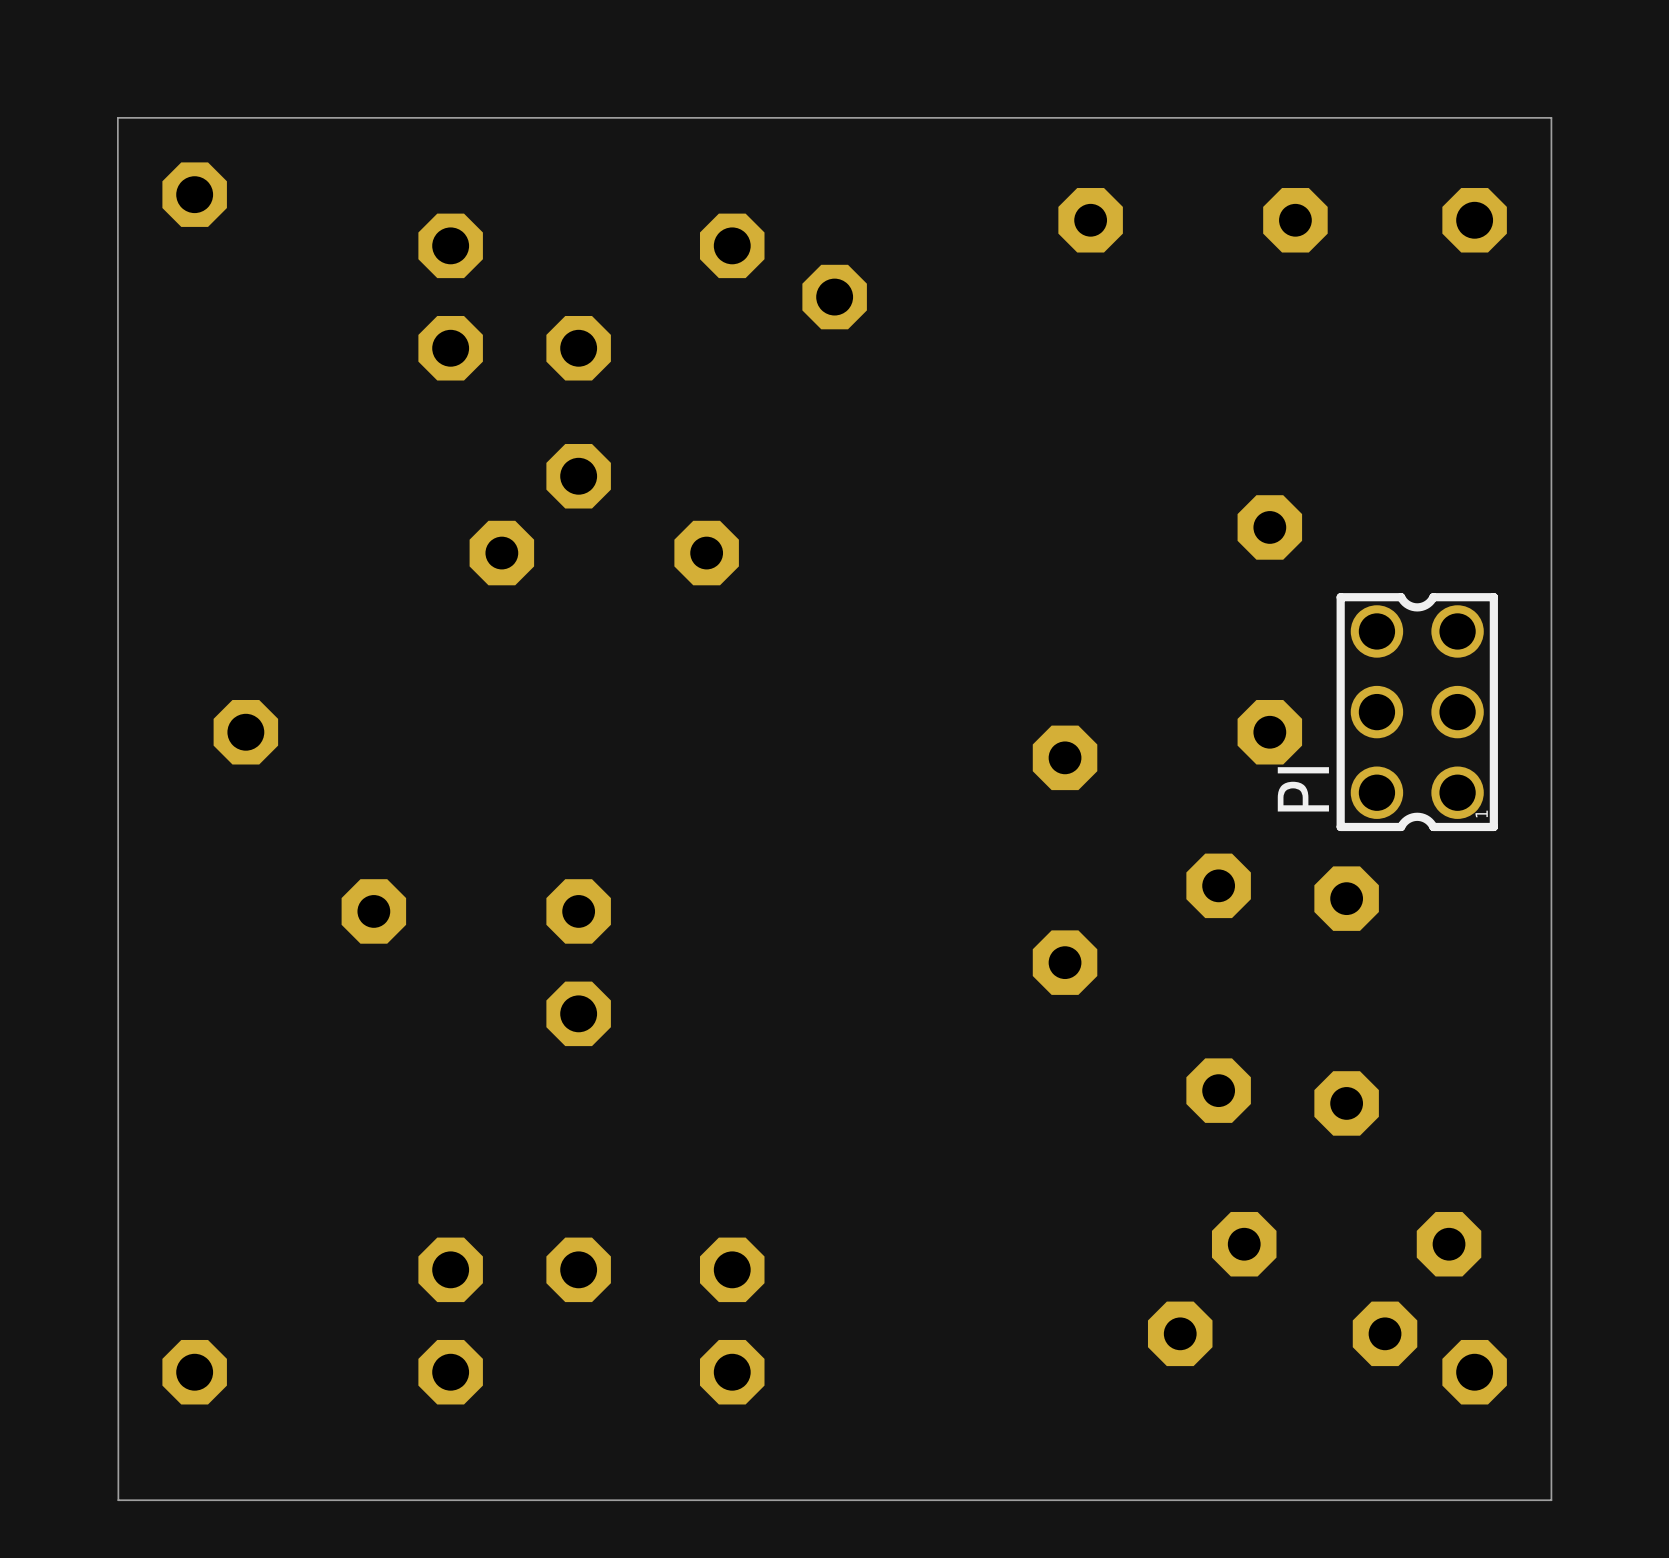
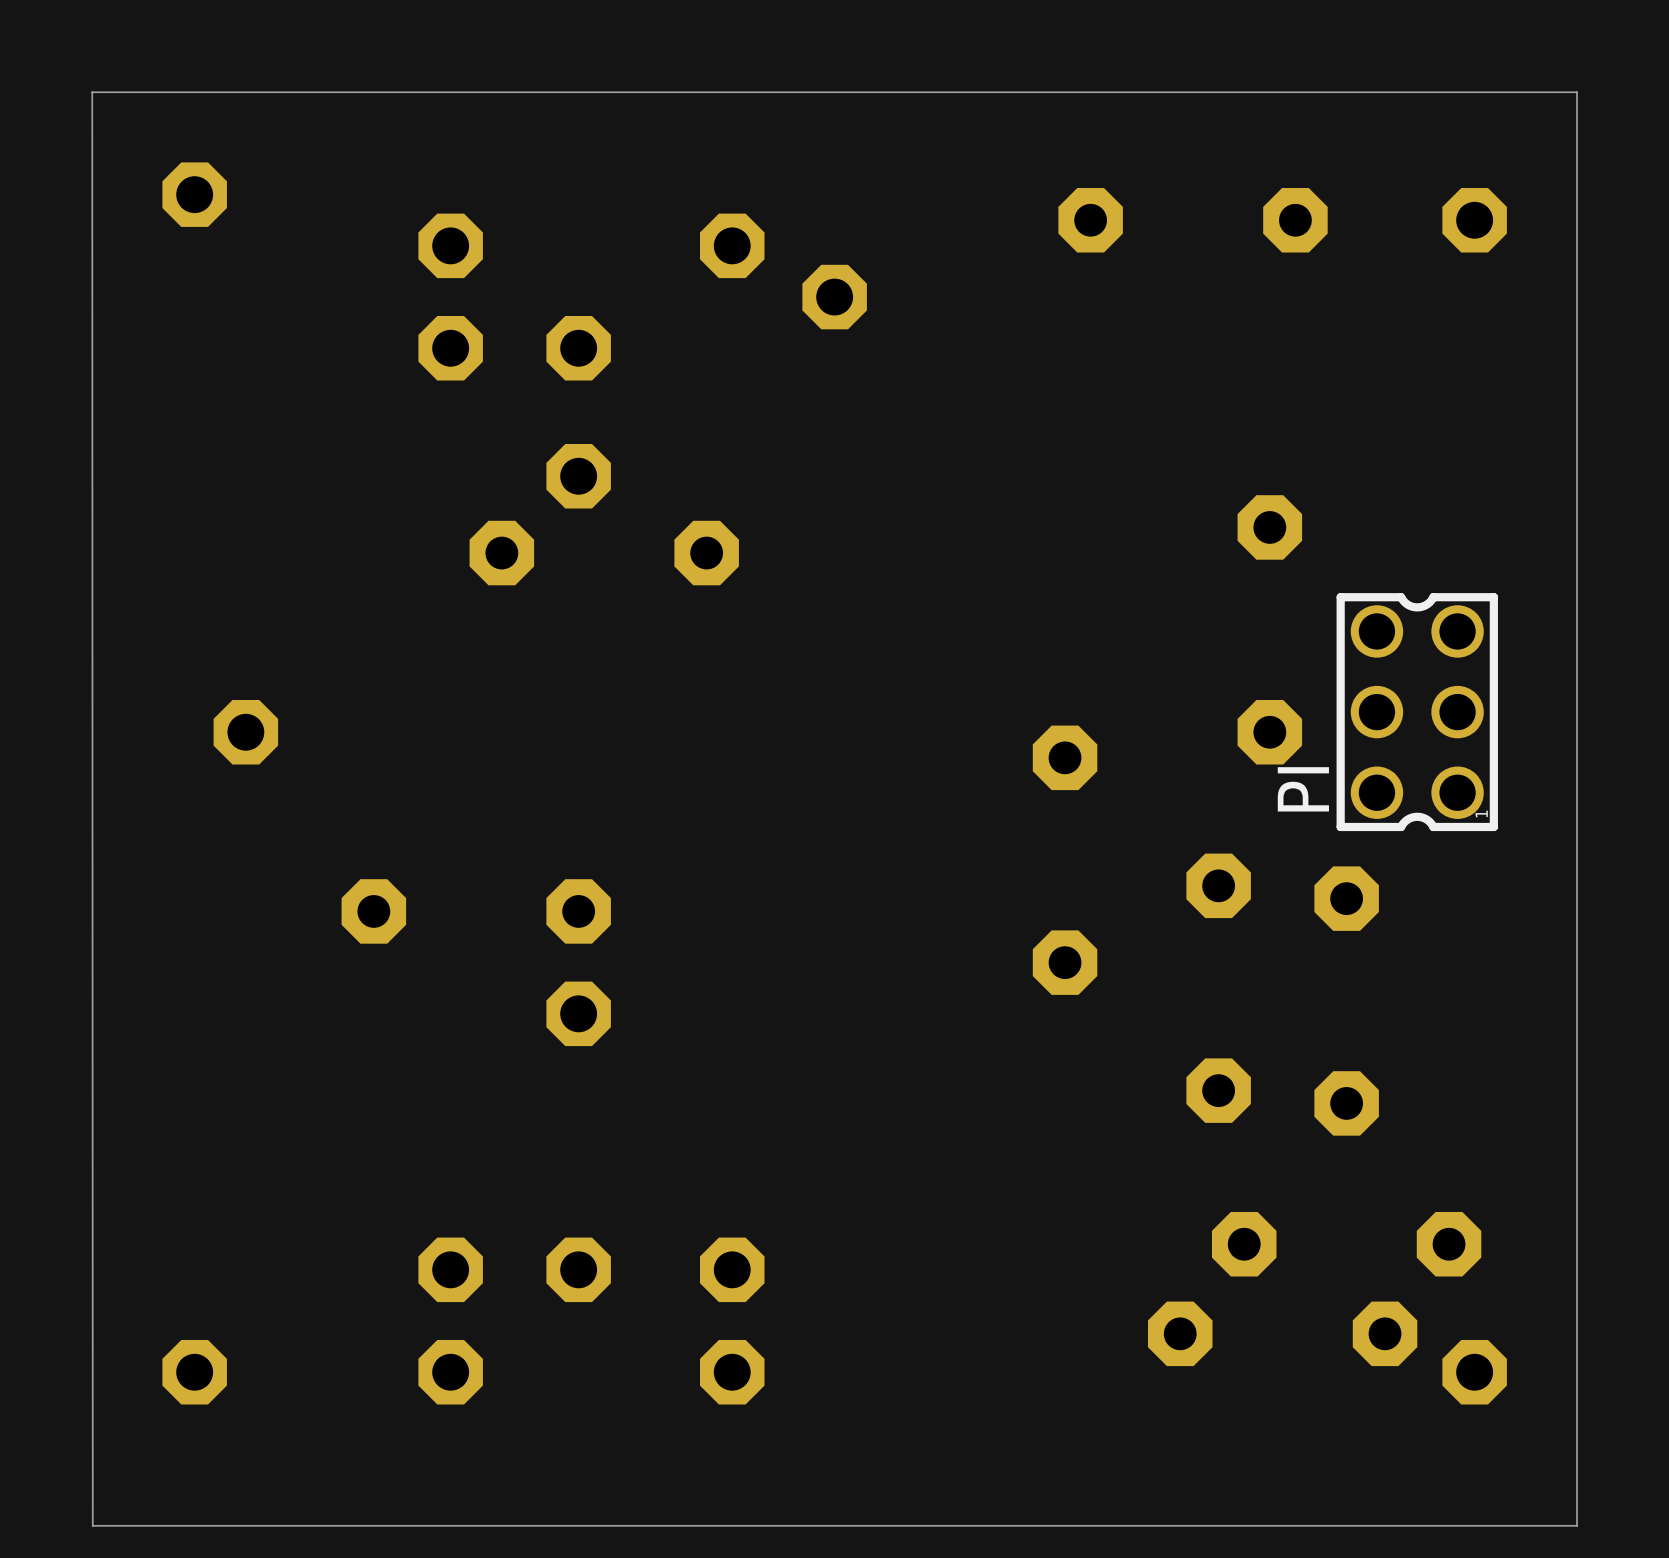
board edge: (1551, 117) (117, 117) (118, 1500) (1551, 1500) (1551, 117) -> (1577, 92) (1577, 1525) (92, 1525) (92, 92) (1577, 92)

